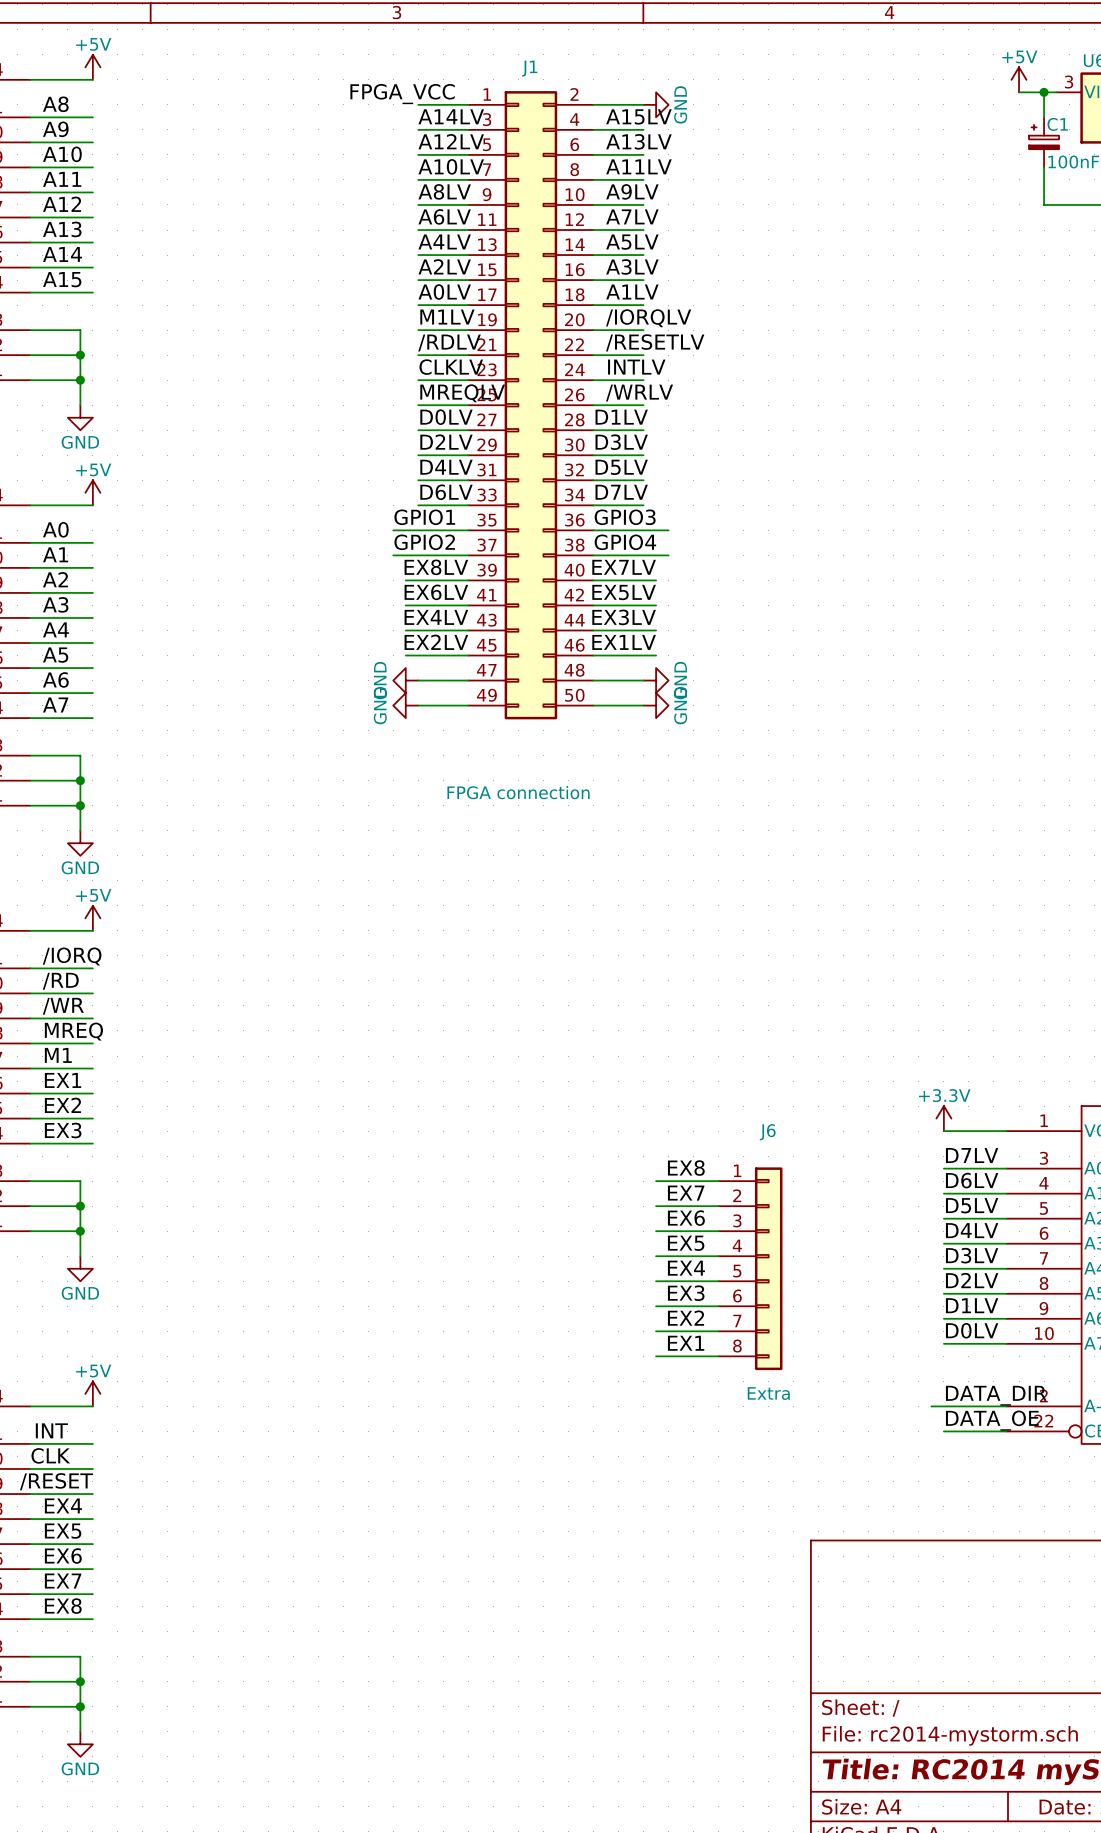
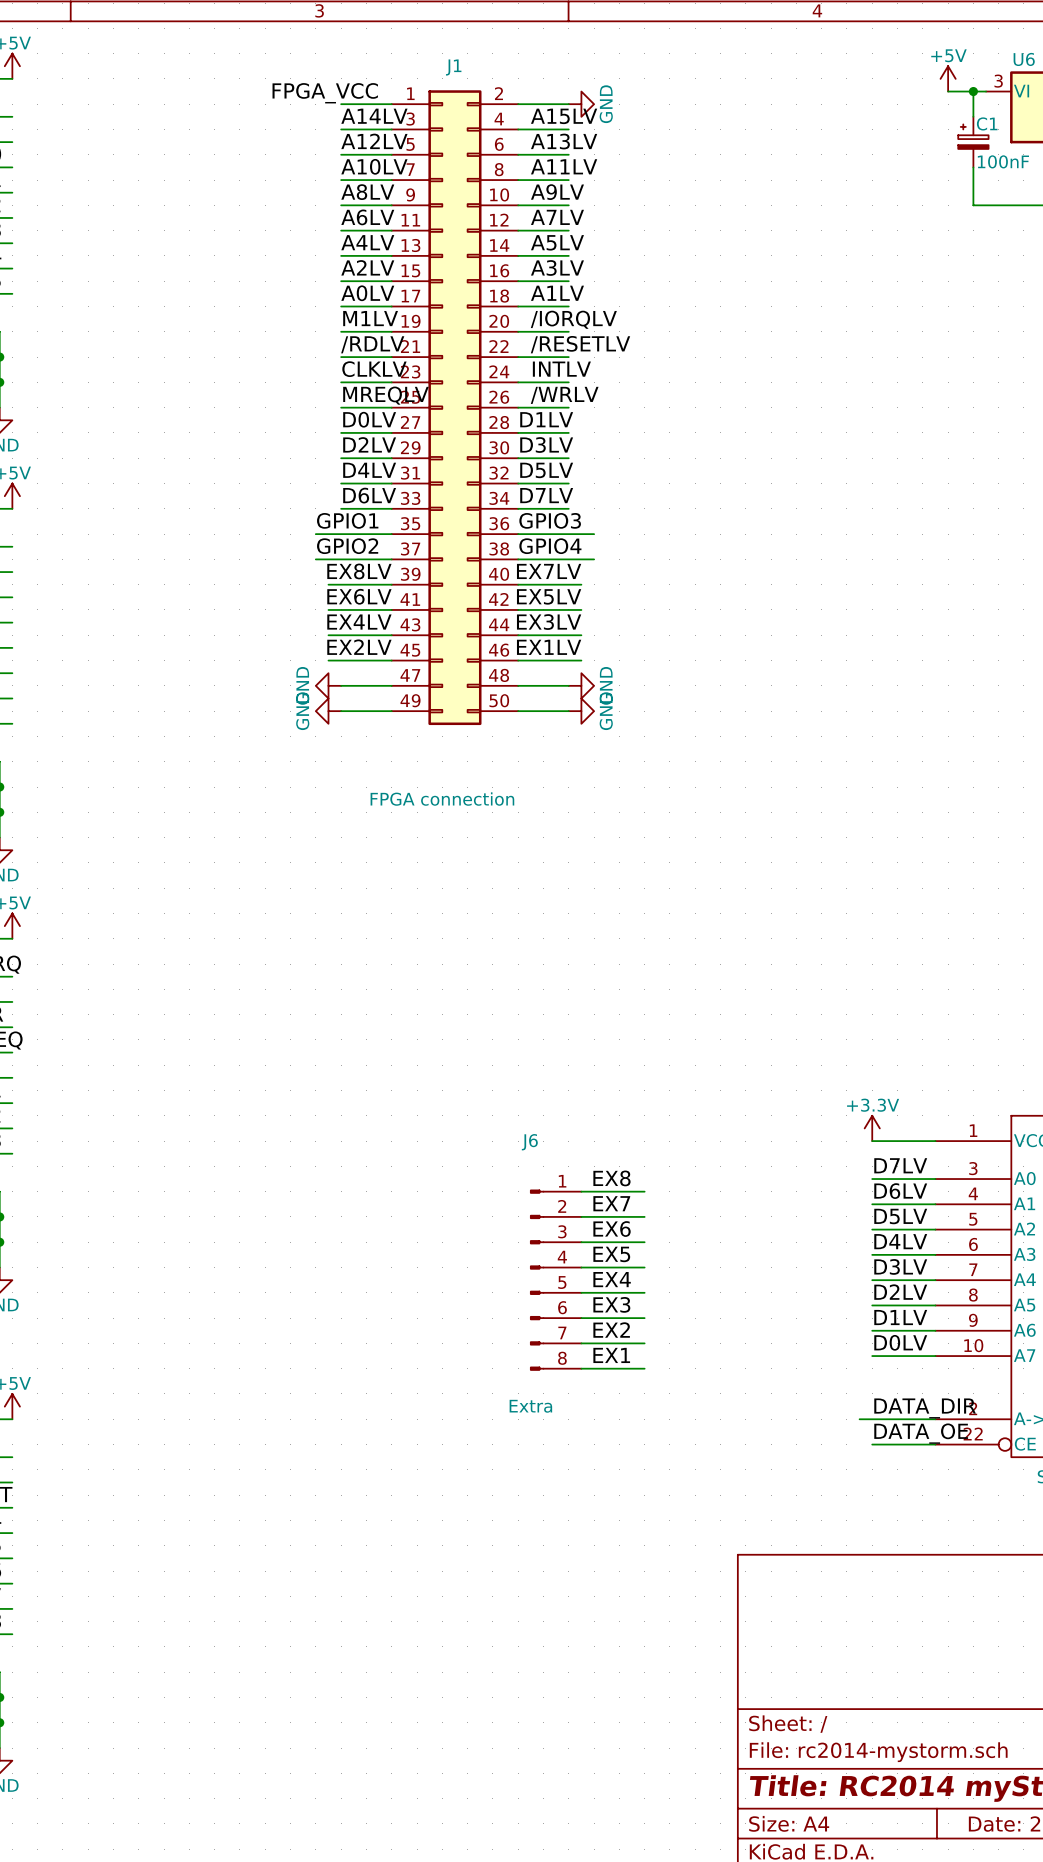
J6 name position: J6 (767, 1132) -> J6 (529, 1142)
J6 symbol: [718, 1167, 783, 1371] -> [530, 1189, 582, 1371]
J6 value position: Extra (768, 1393) -> Extra (530, 1406)

